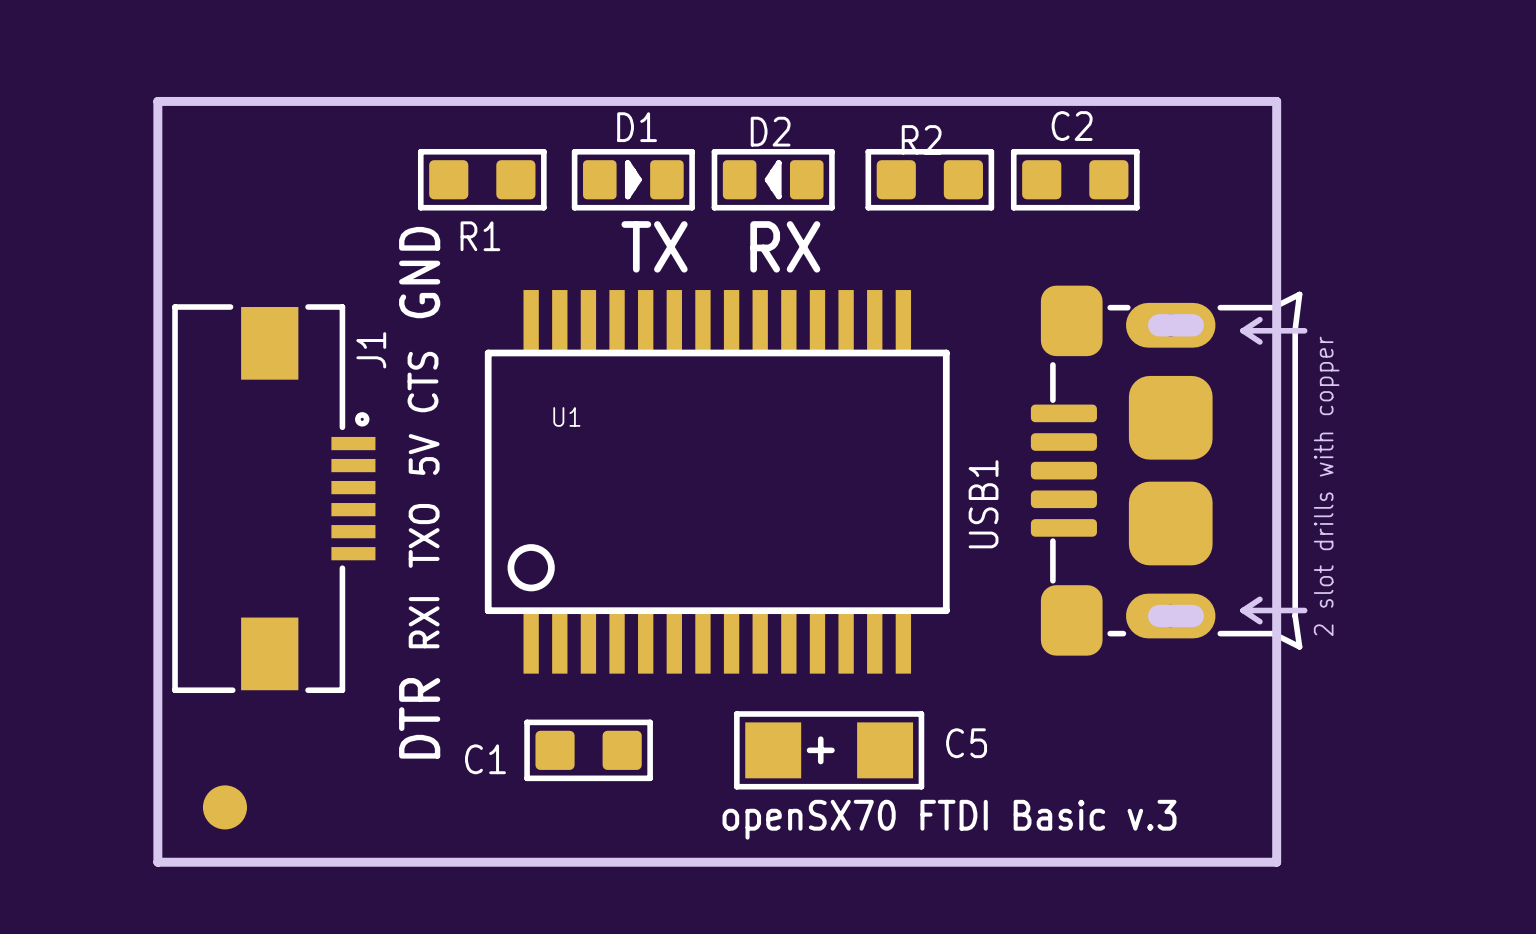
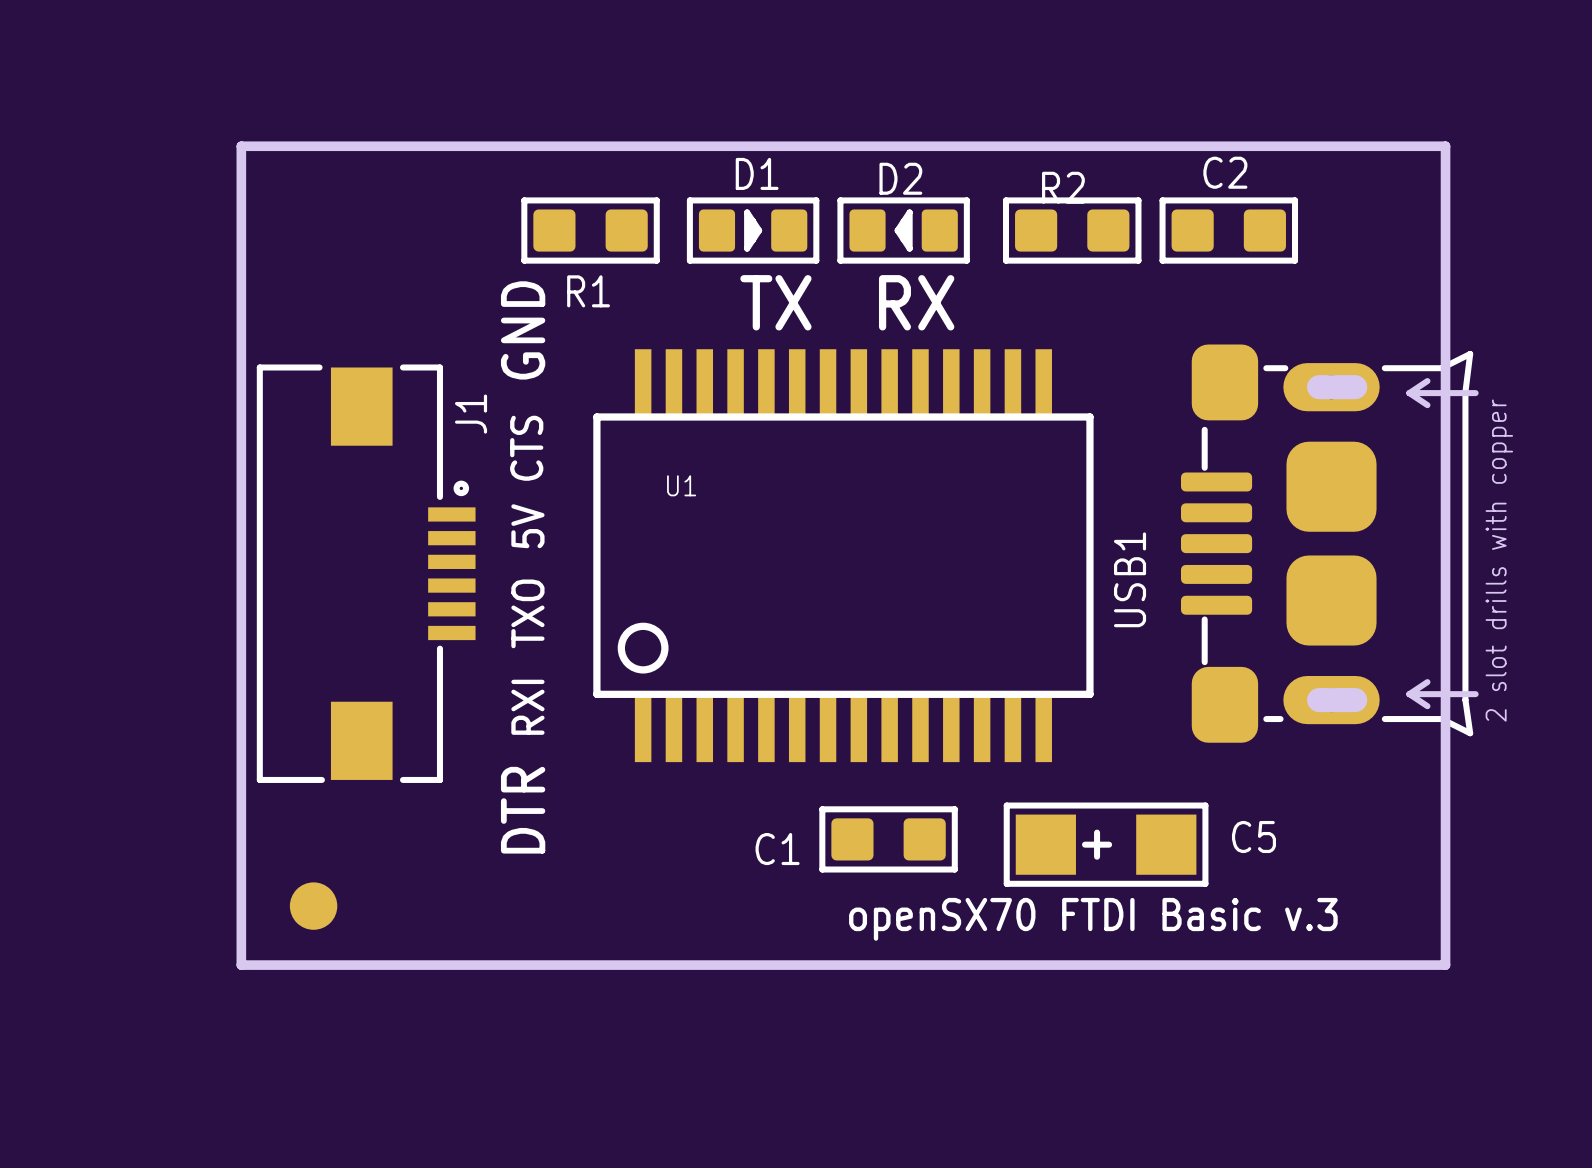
C1 position: (588, 750) -> (888, 839)
C5 position: (829, 750) -> (1106, 844)

